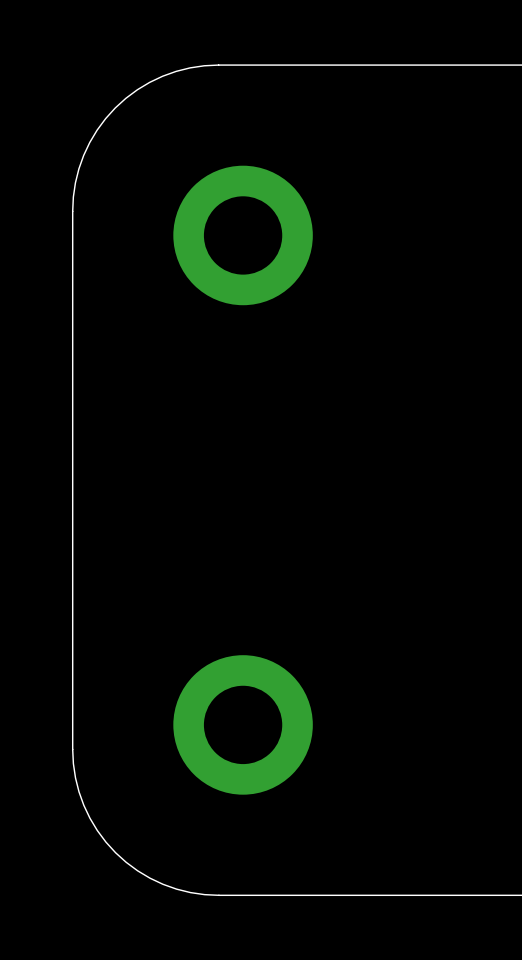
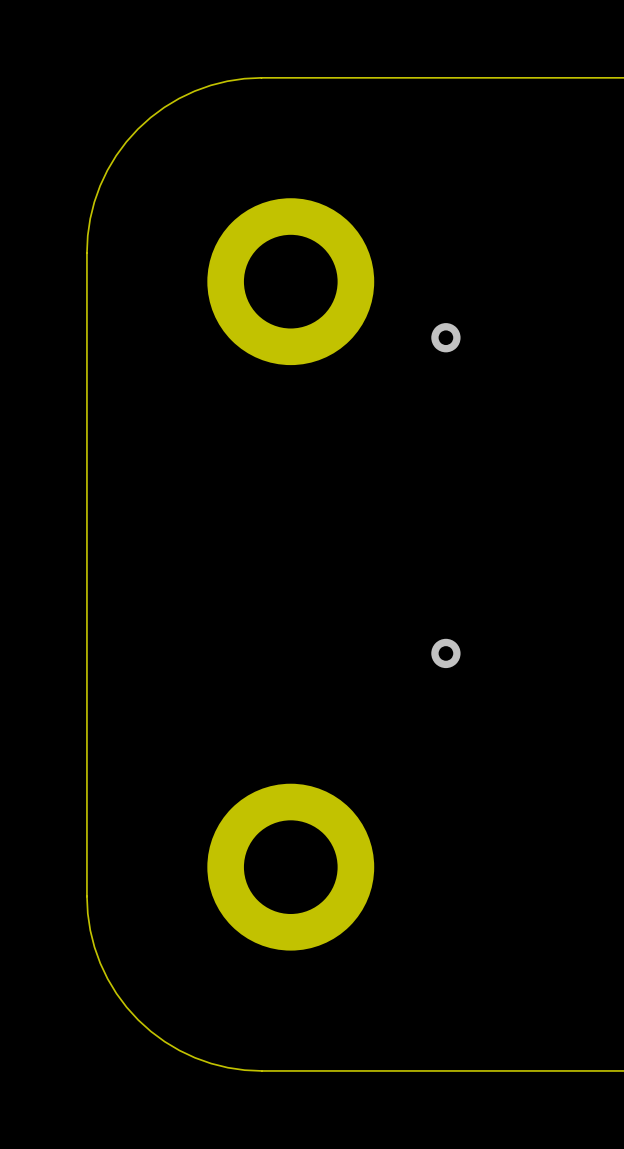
via: none -> (445, 337)
via: none -> (445, 653)

